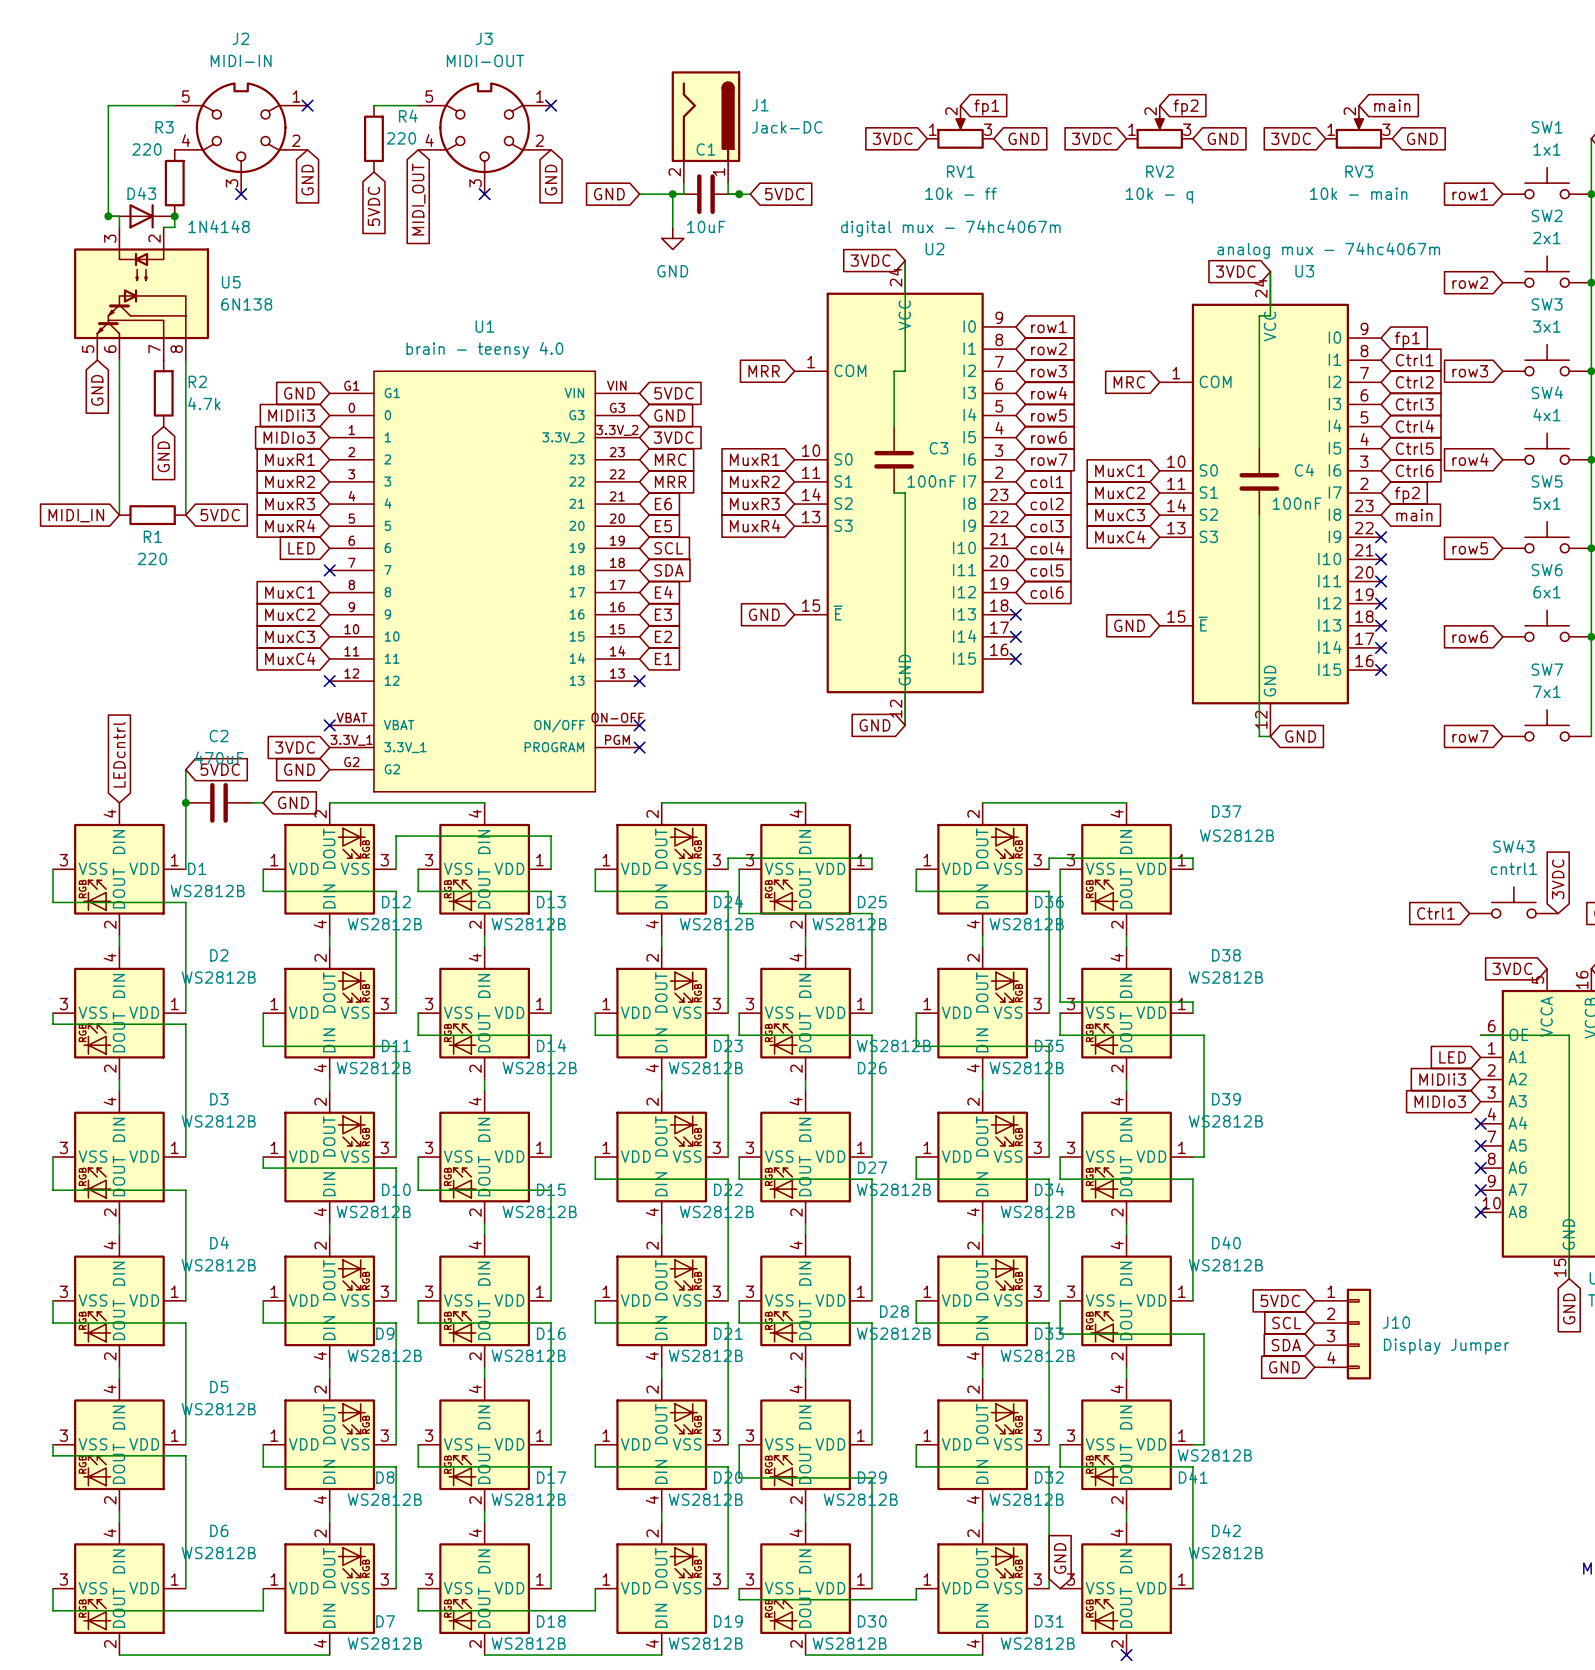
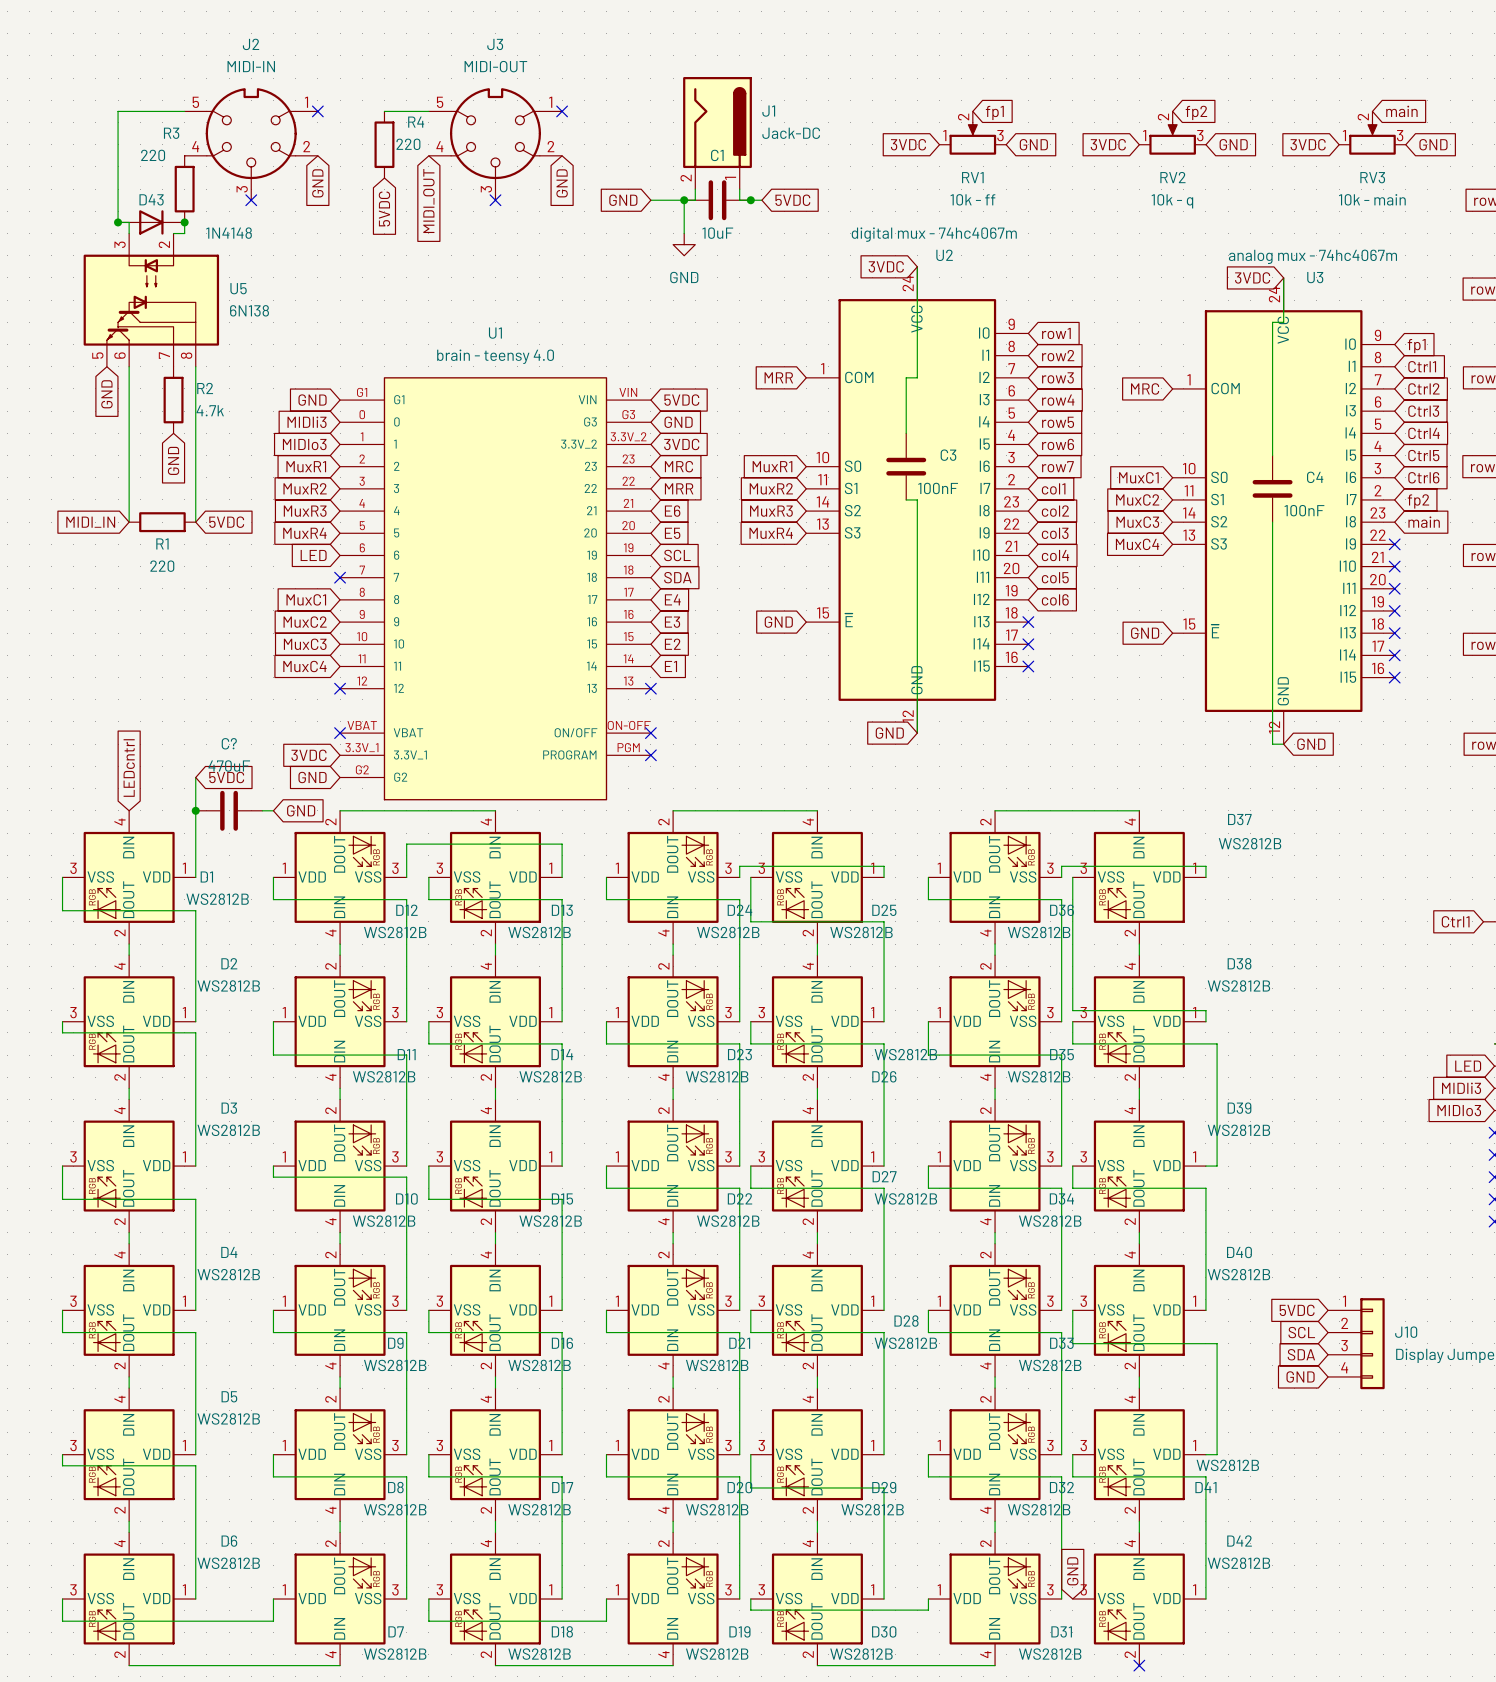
C2 name: C2 (219, 736) -> C? (229, 743)

